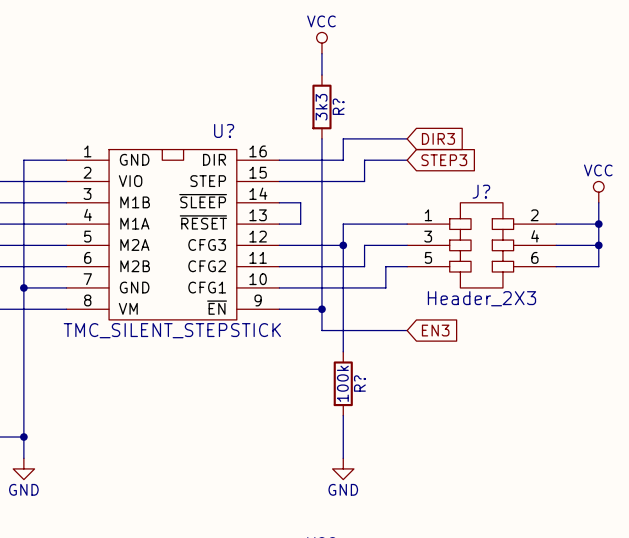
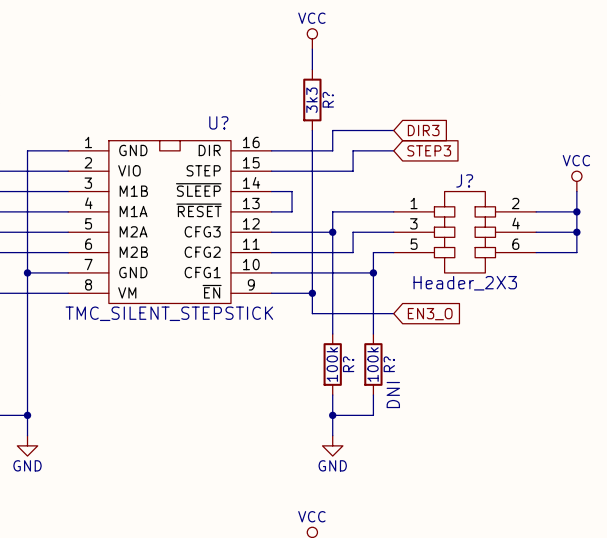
wire: none -> (373, 272) (373, 333)
junction: none -> (373, 272)
global label: EN3 (435, 330) -> EN3_O (430, 314)
R?: none -> 100k (373, 364)
wire: none -> (373, 395) (373, 415) (332, 415)
junction: none -> (332, 415)

